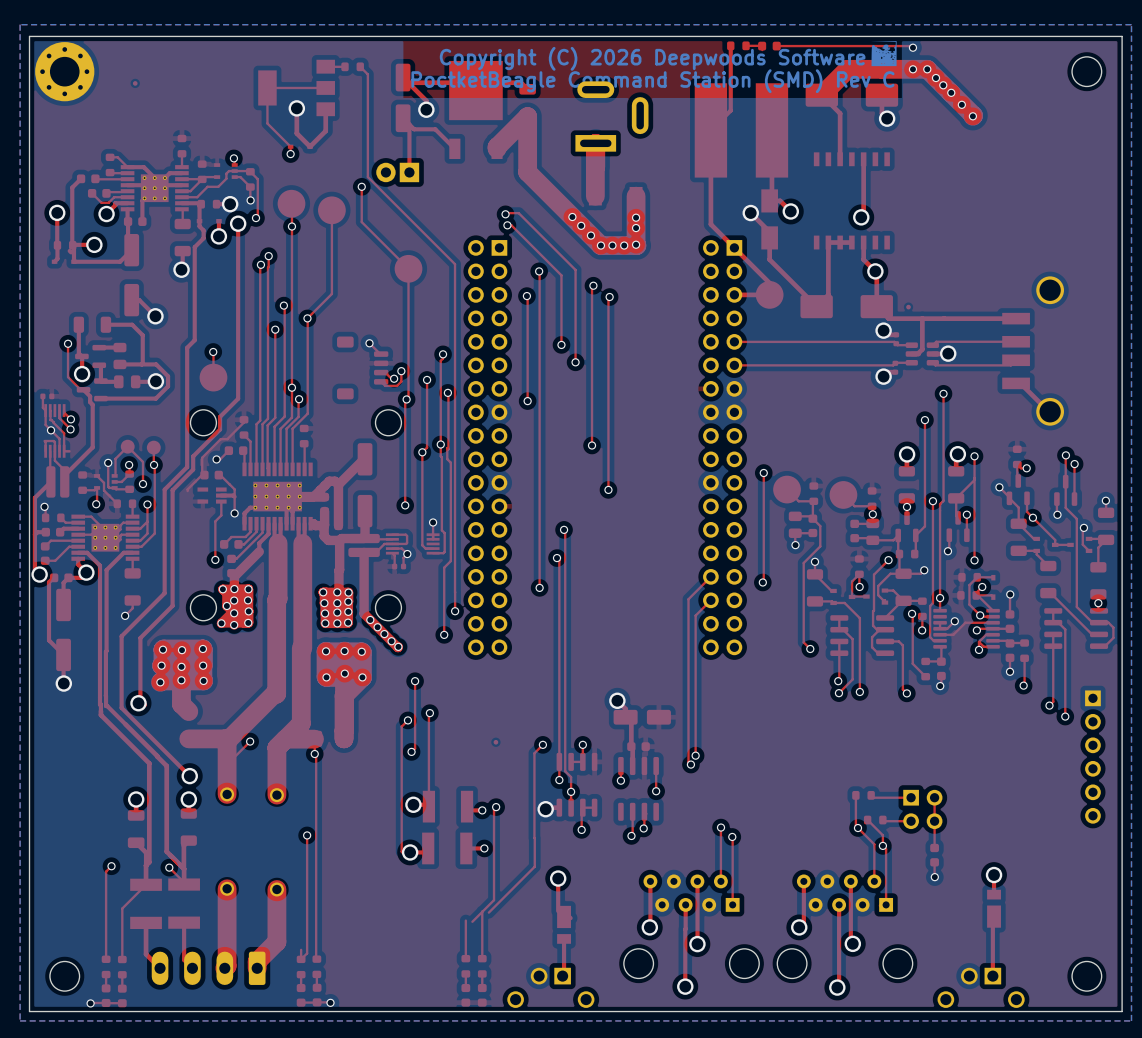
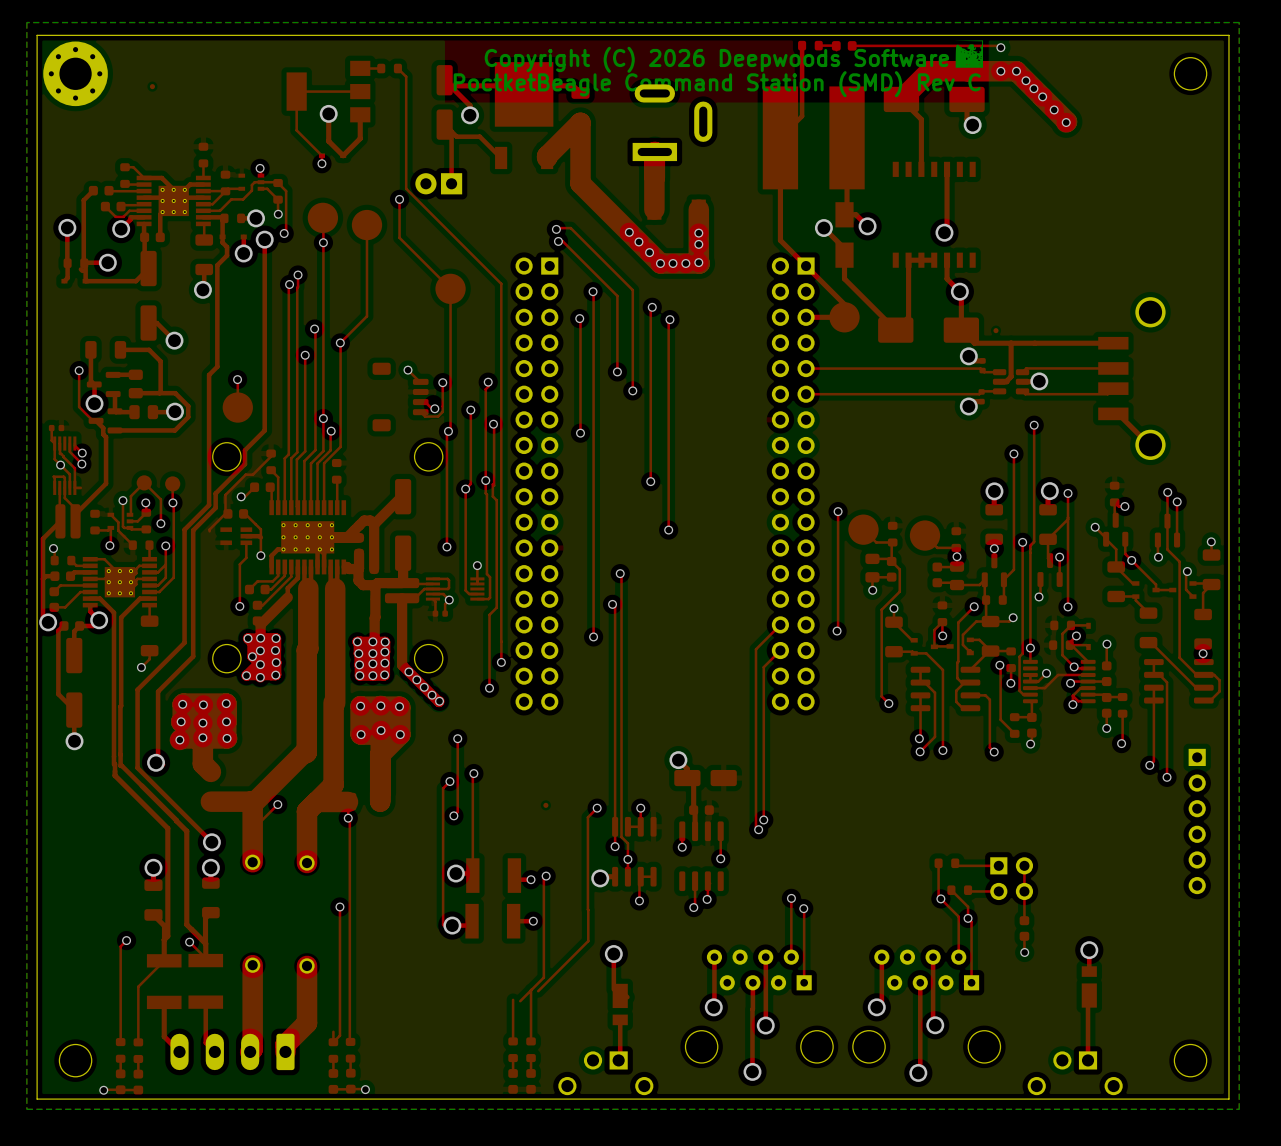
top track: none -> (442, 382) (442, 400)
via position: (401, 371) -> (442, 382)

